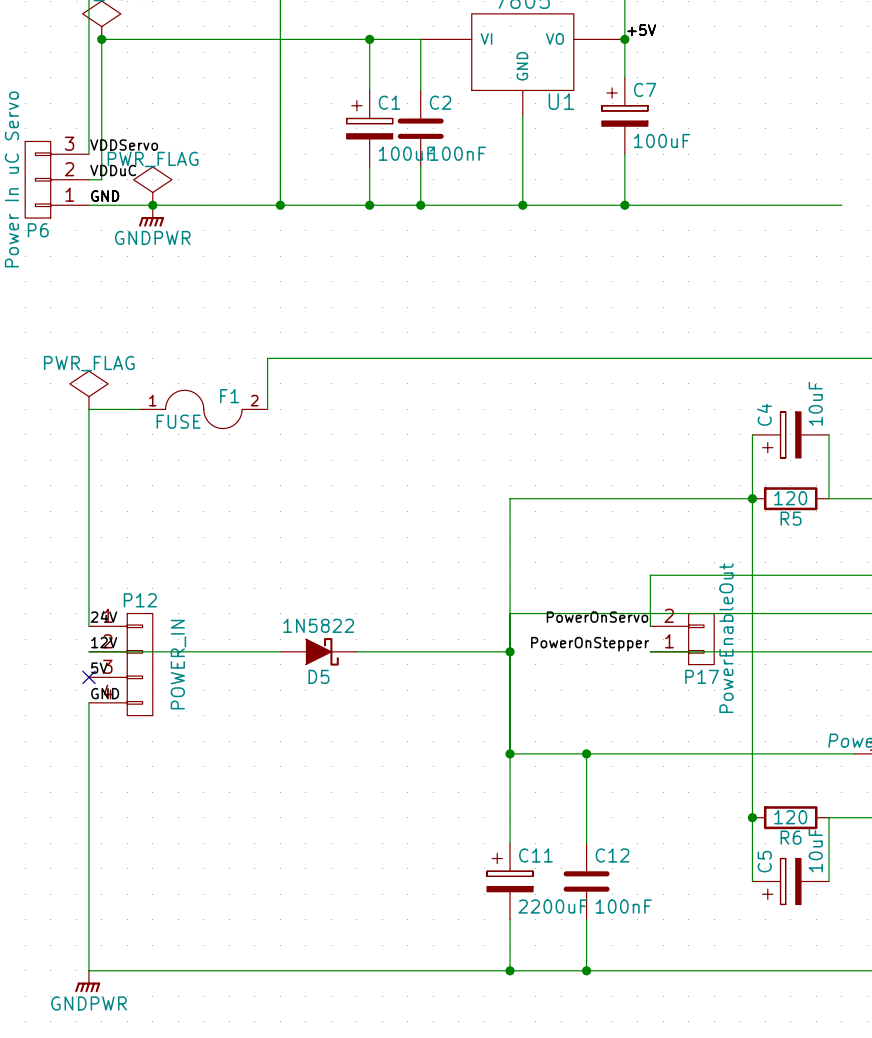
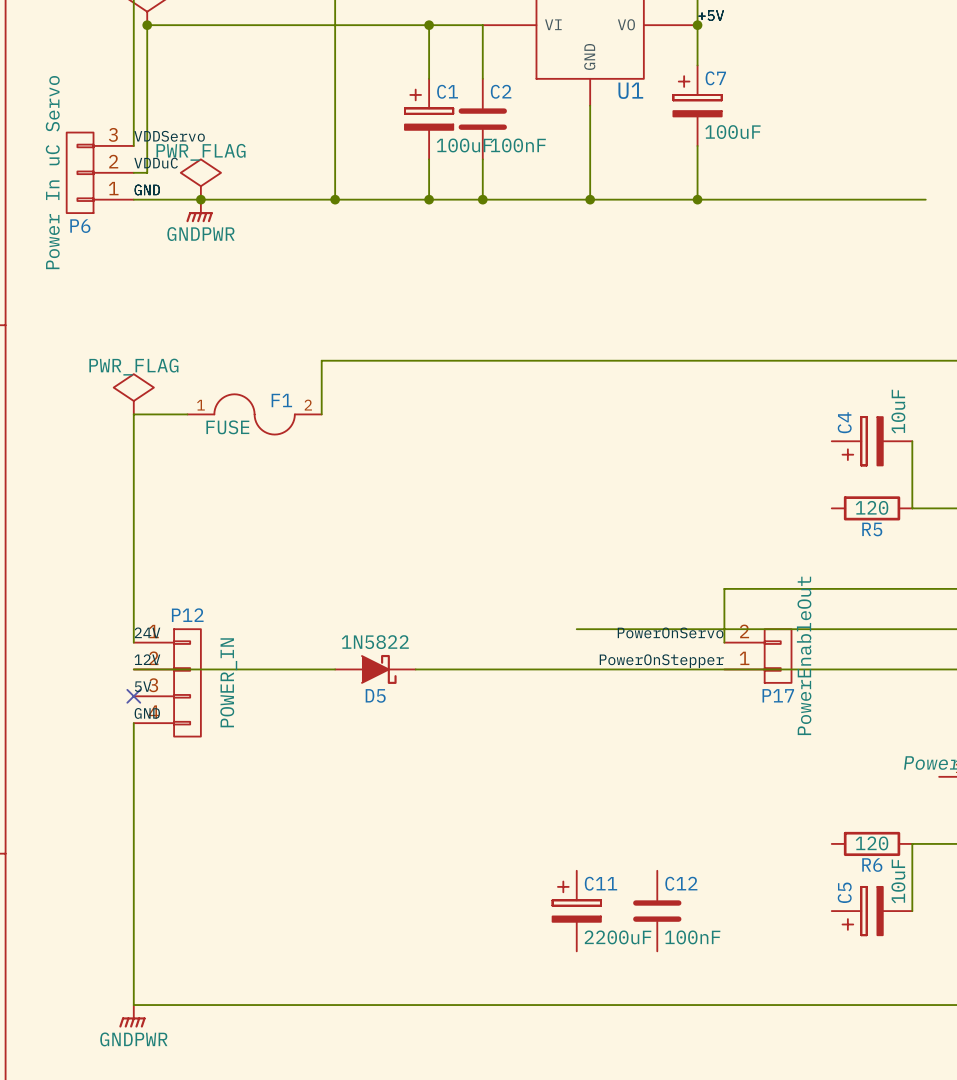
wire: (752, 434) (752, 881) -> none
wire: (752, 498) (510, 498) (510, 843) -> none
junction: (752, 498) -> none
wire: none -> (576, 669) (724, 669)
junction: (510, 651) -> none
wire: (510, 753) (854, 753) -> none
junction: (510, 753) -> none
wire: (586, 753) (586, 843) -> none
junction: (586, 753) -> none
junction: (752, 817) -> none
wire: (510, 919) (510, 970) -> none
wire: (586, 919) (586, 970) -> none
junction: (510, 970) -> none
junction: (586, 970) -> none

